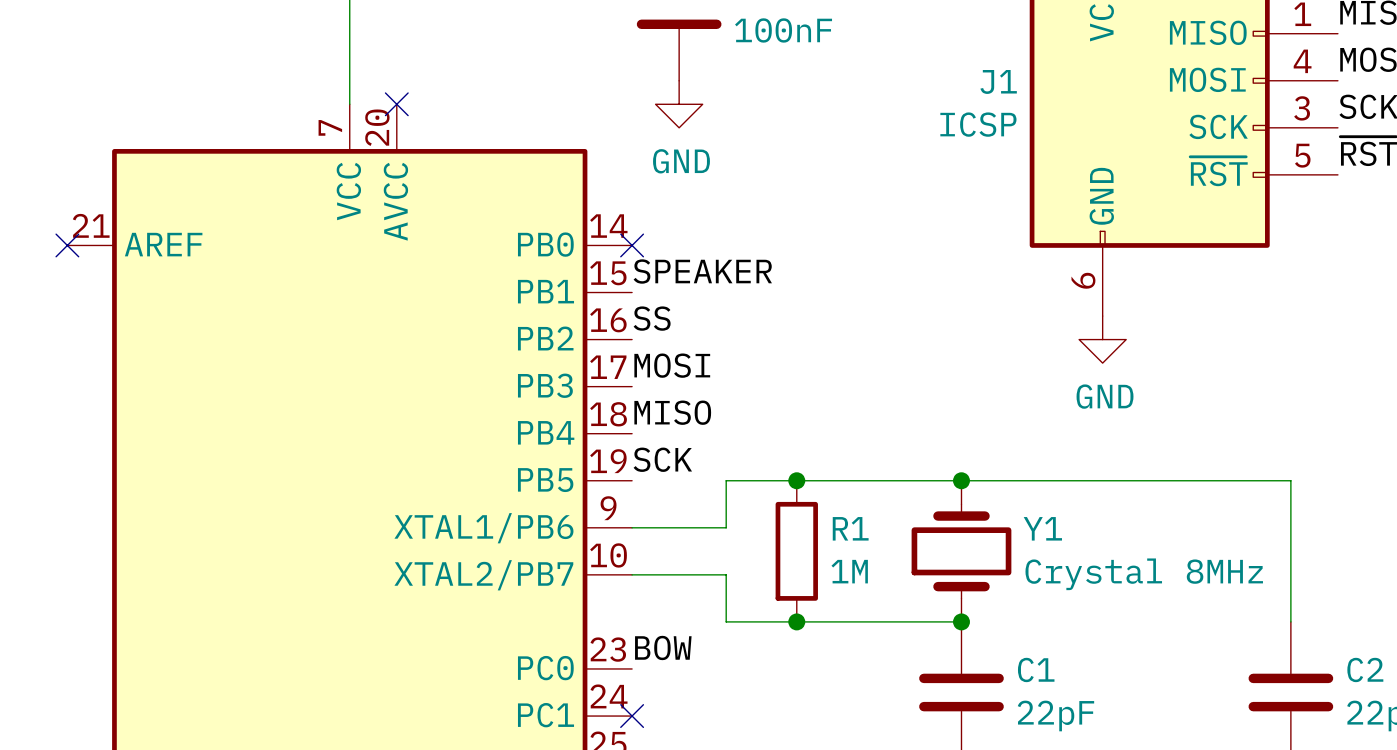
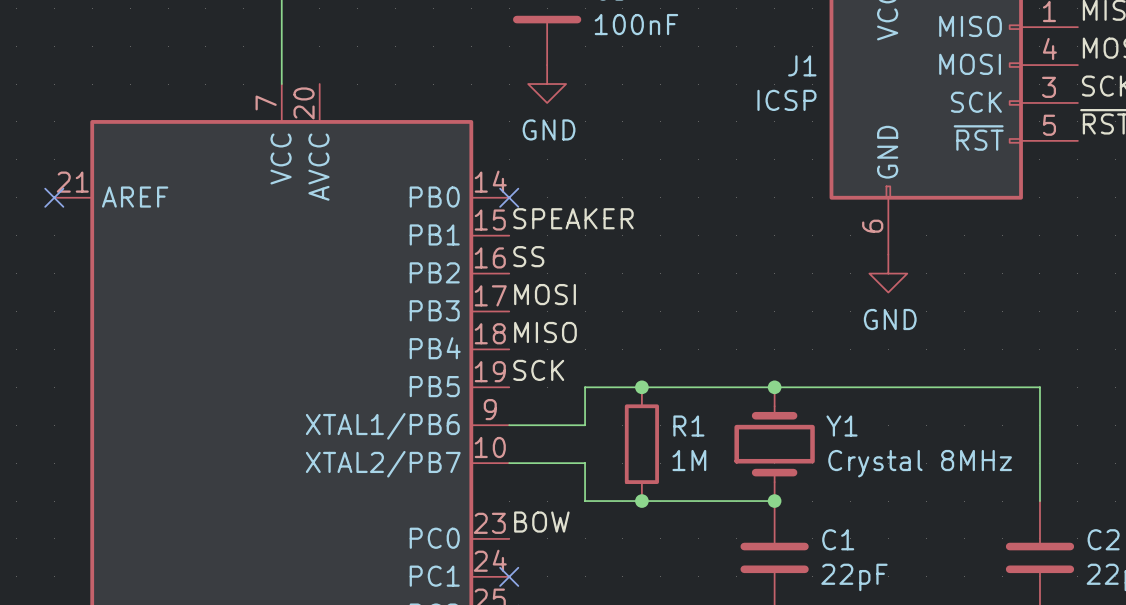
no-connect mark: (396, 104) -> none

